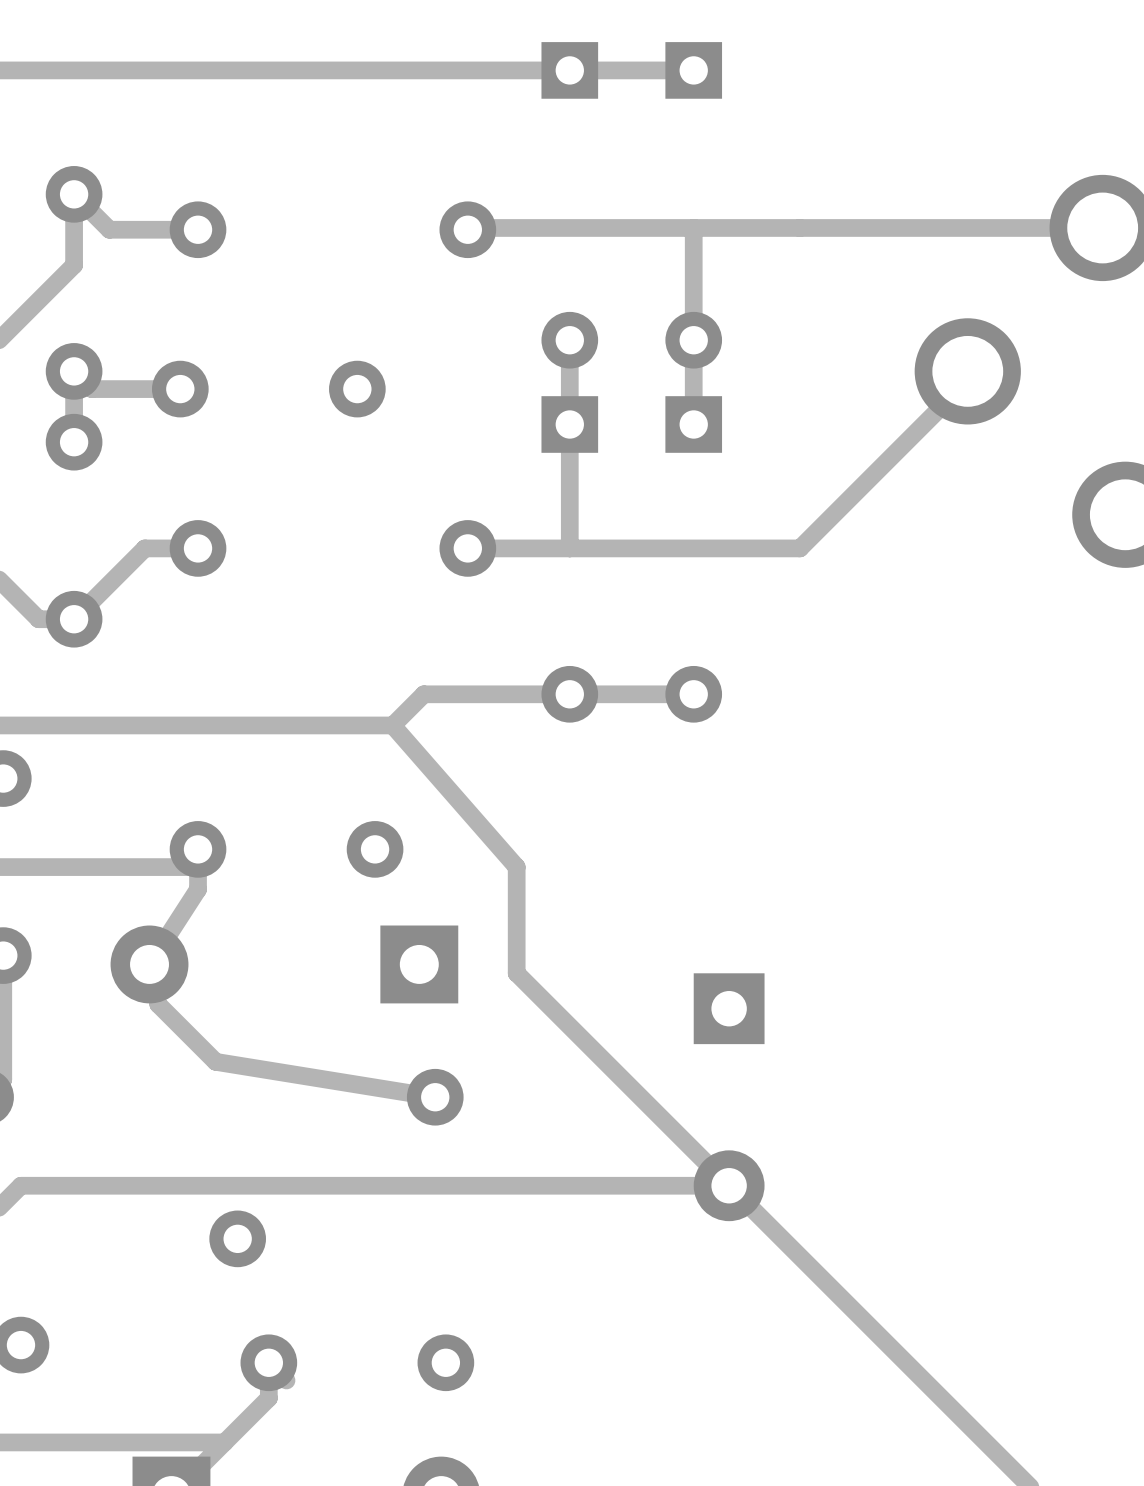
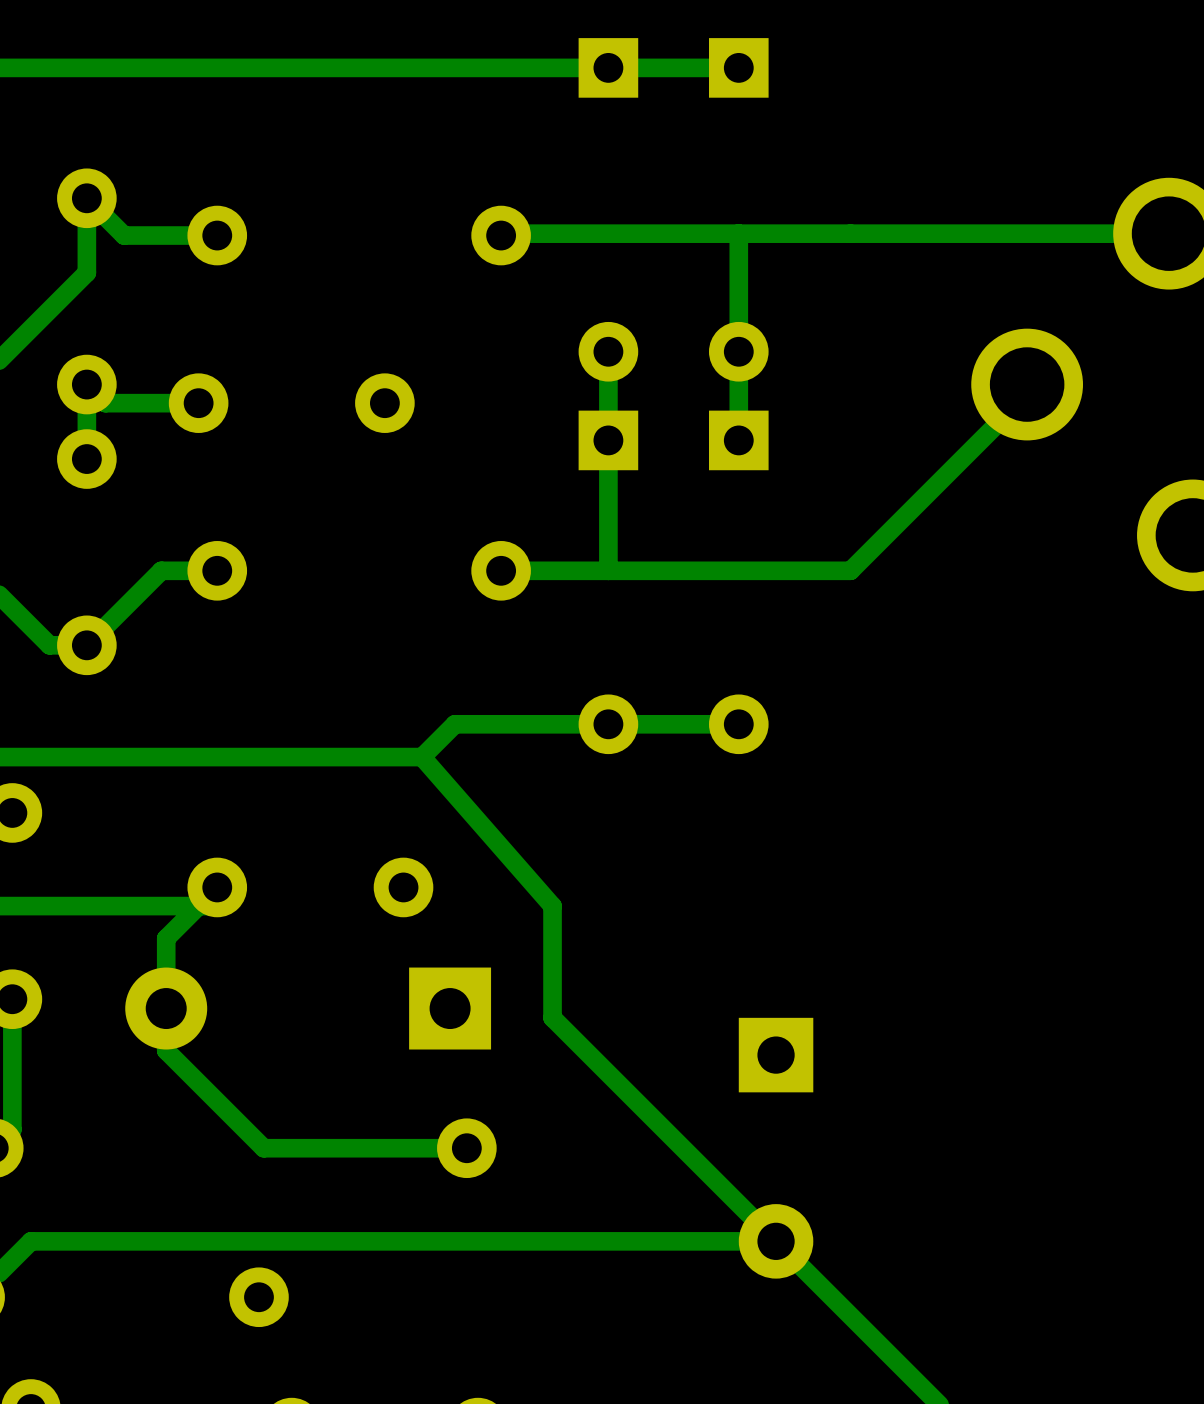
track: (198, 867) (198, 889) (149, 964) (158, 1004) (215, 1061) (435, 1097) -> (217, 887) (166, 938) (166, 1050) (263, 1148) (466, 1148)

